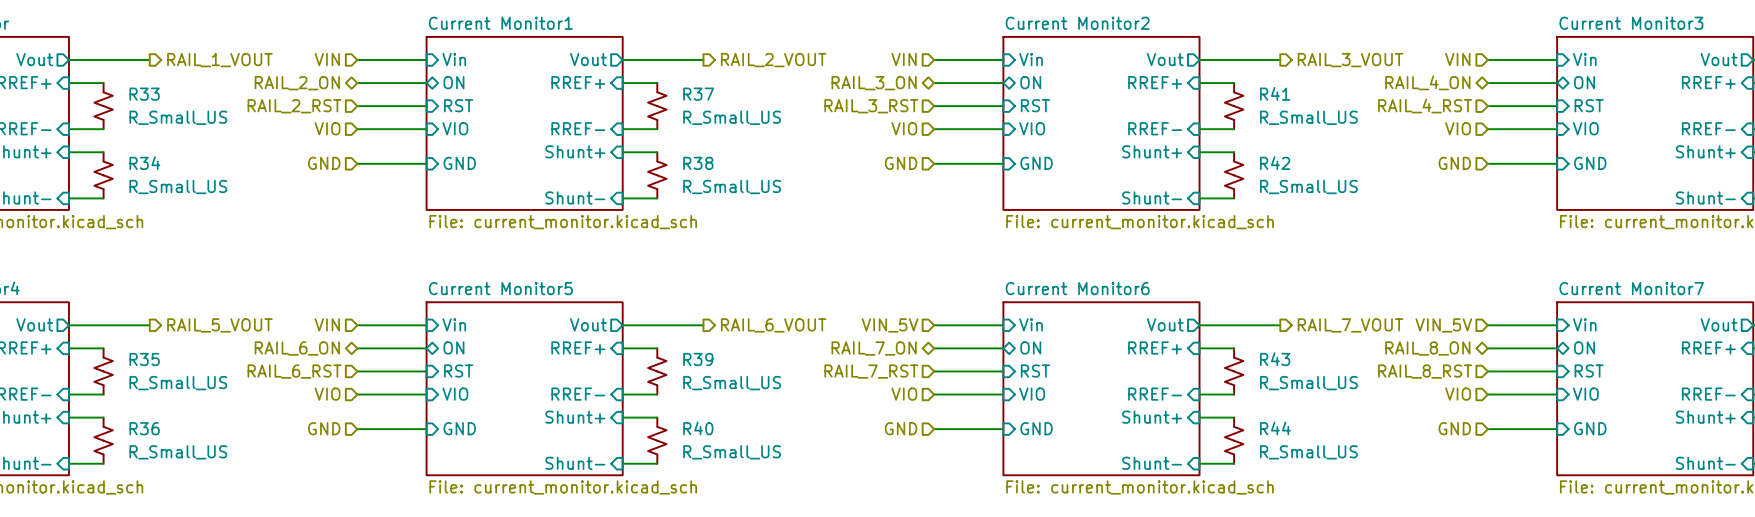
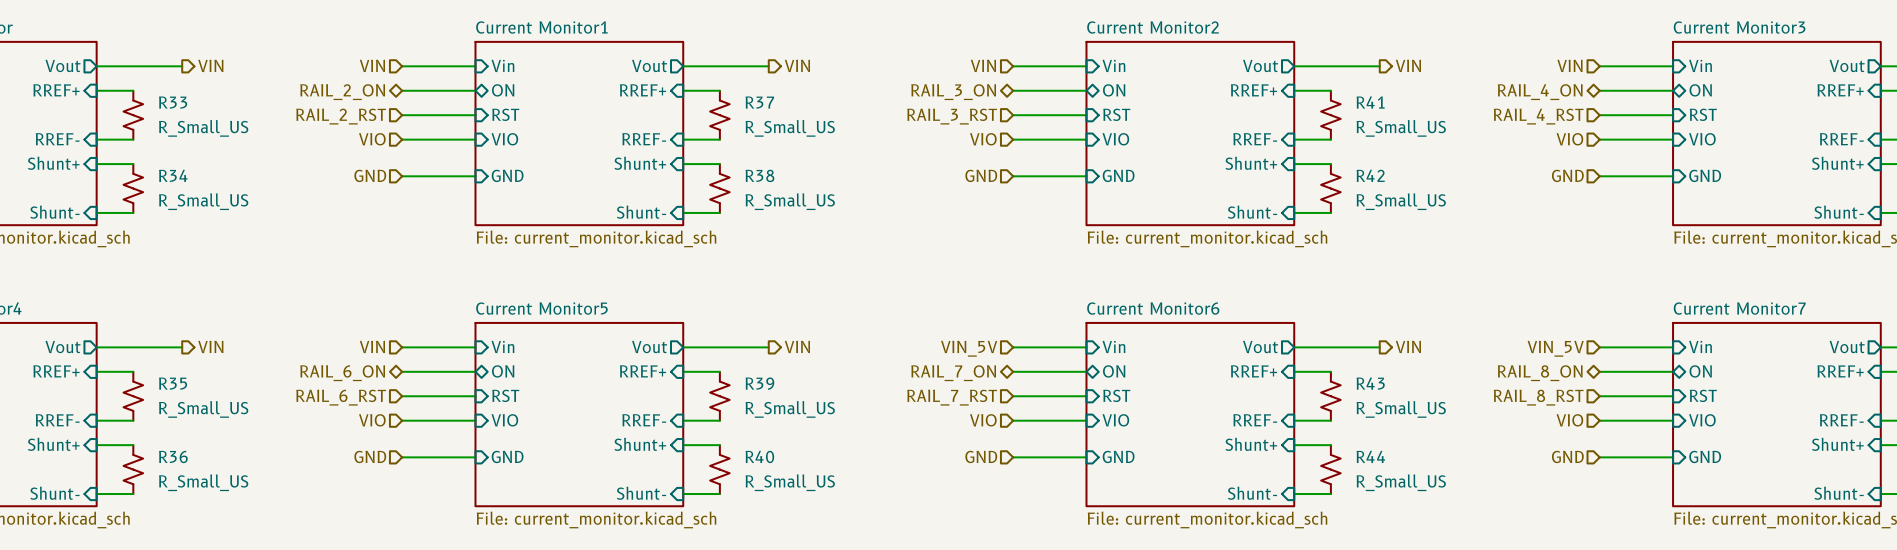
hierarchical label: RAIL_1_VOUT (219, 60) -> VIN (210, 65)
hierarchical label: RAIL_2_VOUT (773, 60) -> VIN (797, 65)
hierarchical label: RAIL_3_VOUT (1350, 60) -> VIN (1408, 65)
hierarchical label: RAIL_5_VOUT (219, 325) -> VIN (210, 347)
hierarchical label: RAIL_6_VOUT (773, 325) -> VIN (797, 347)
hierarchical label: RAIL_7_VOUT (1350, 325) -> VIN (1408, 347)

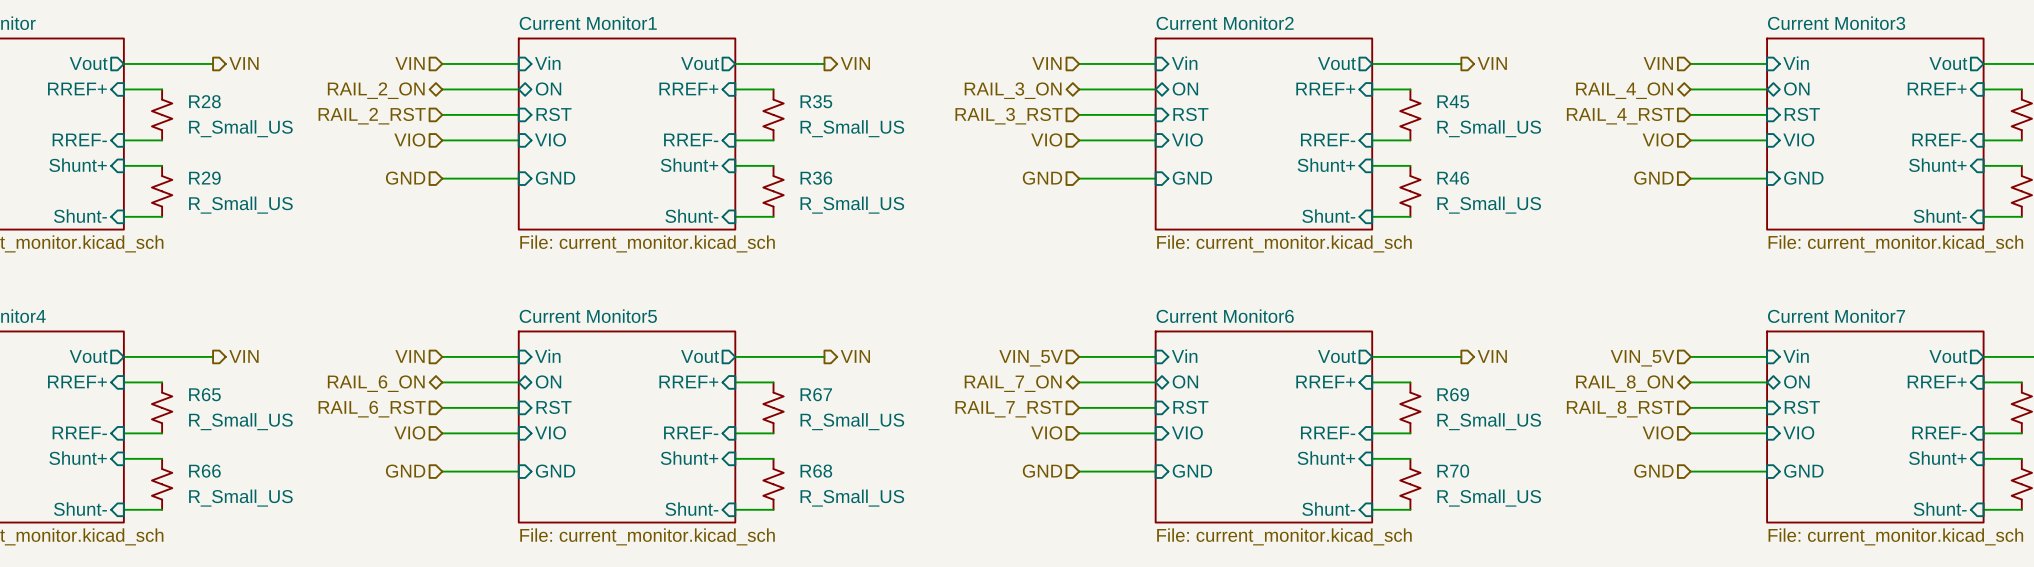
R33 name: R33 (173, 102) -> R28 (204, 101)
R37 name: R37 (759, 102) -> R35 (816, 101)
R41 name: R41 (1370, 102) -> R45 (1453, 101)
R34 name: R34 (173, 175) -> R29 (204, 178)
R38 name: R38 (759, 175) -> R36 (816, 178)
R42 name: R42 (1370, 175) -> R46 (1453, 178)
R35 name: R35 (173, 383) -> R65 (204, 394)
R39 name: R39 (759, 383) -> R67 (816, 394)
R43 name: R43 (1370, 383) -> R69 (1453, 394)
R36 name: R36 (173, 456) -> R66 (204, 471)
R40 name: R40 (759, 456) -> R68 (816, 471)
R44 name: R44 (1370, 456) -> R70 (1453, 471)

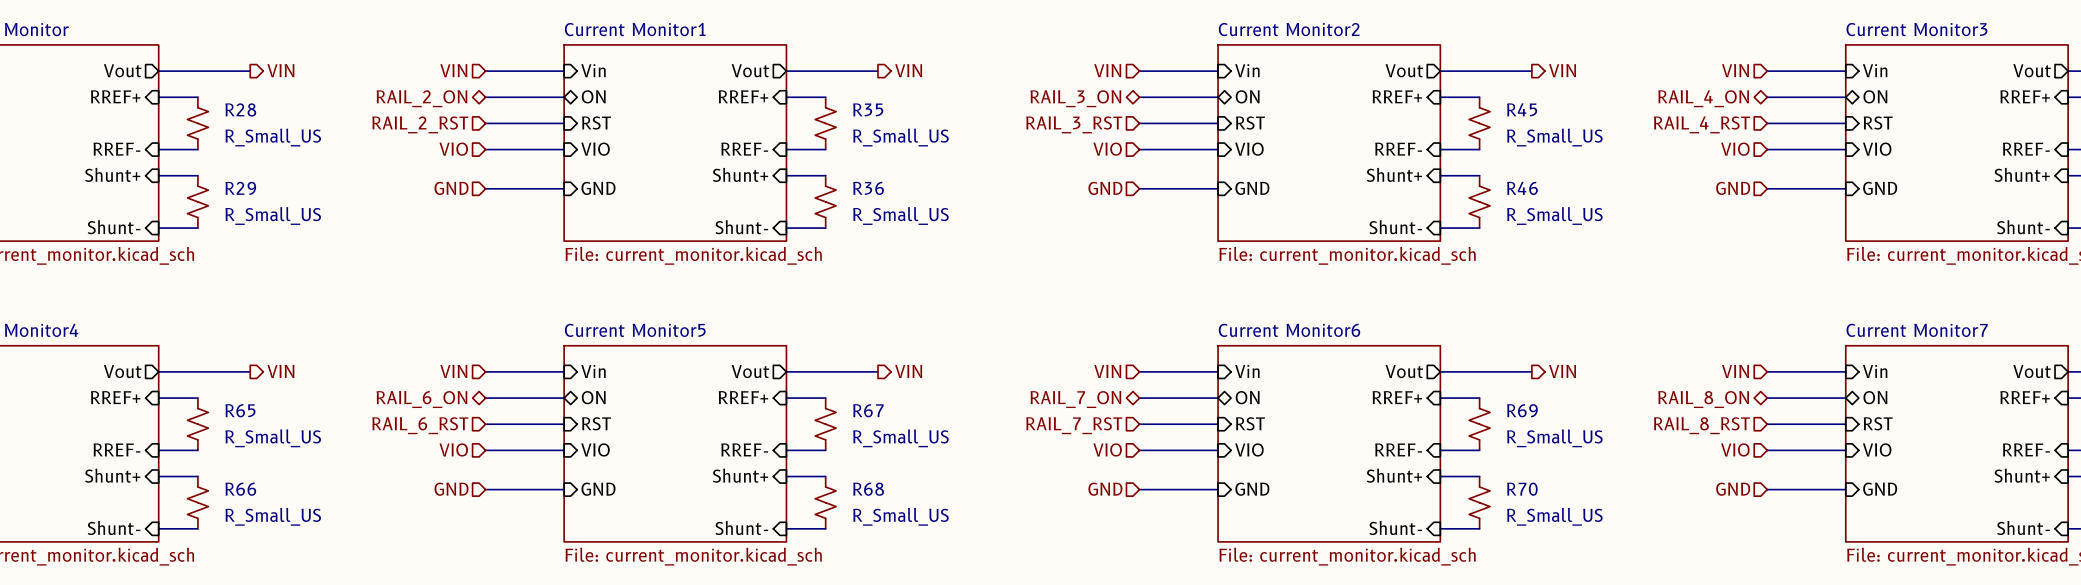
hierarchical label: VIN_5V (1031, 358) -> VIN (1107, 371)
hierarchical label: VIN_5V (1642, 358) -> VIN (1735, 371)

